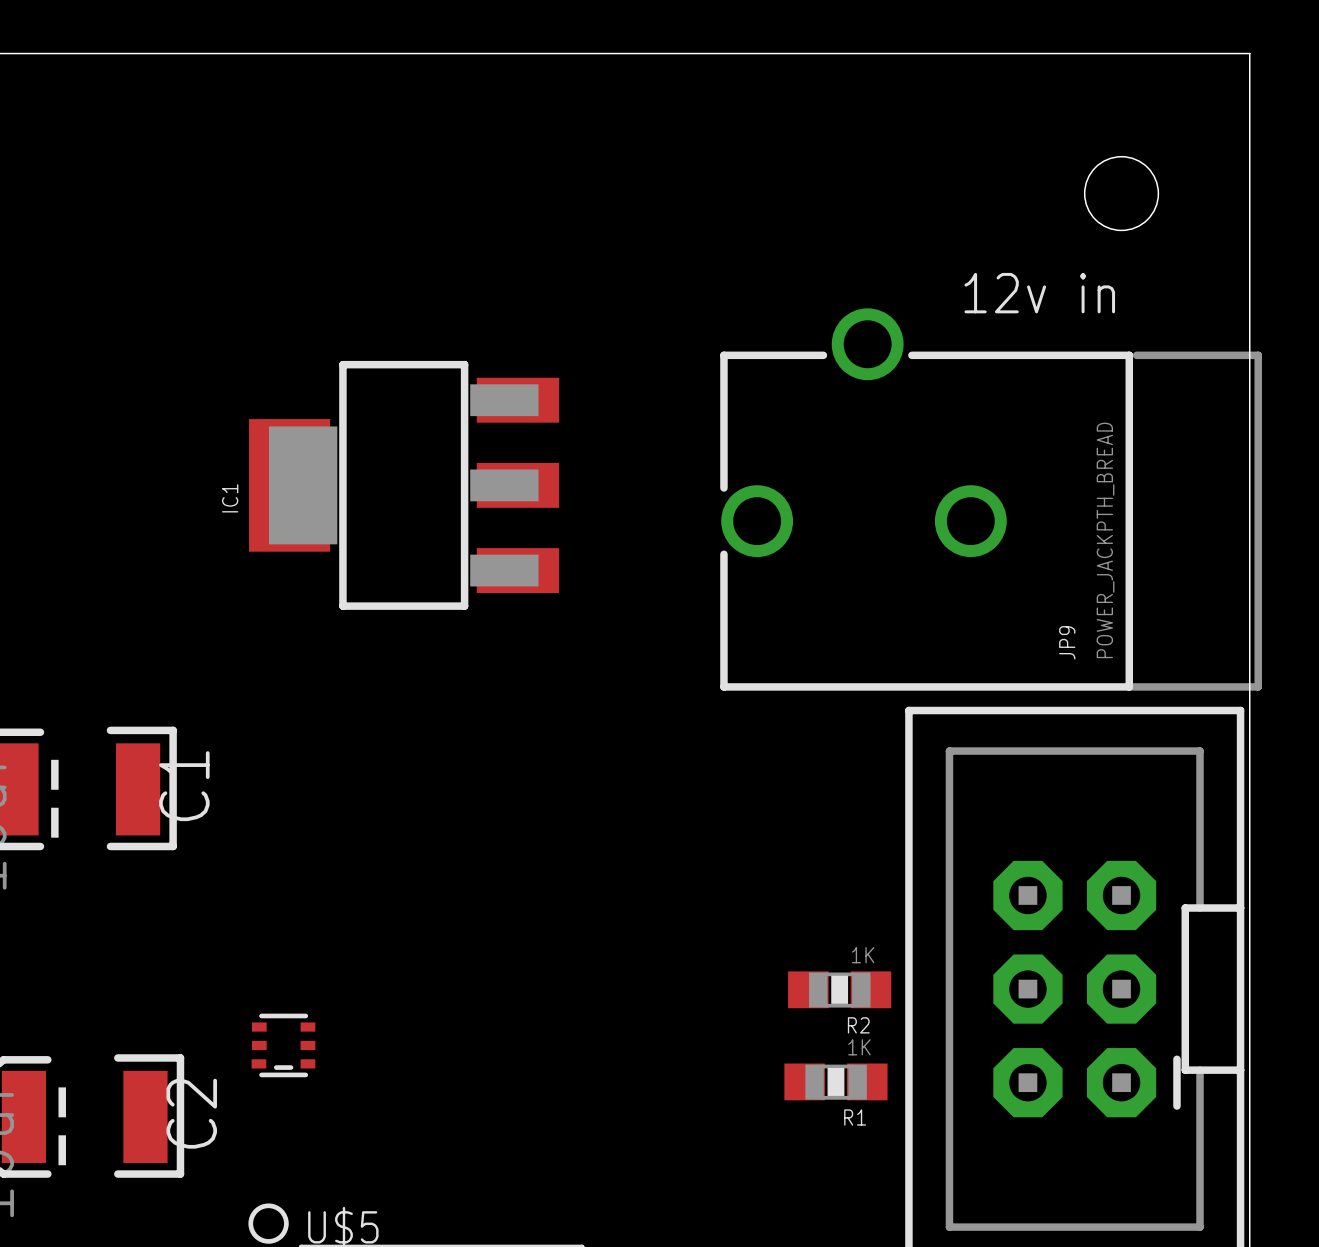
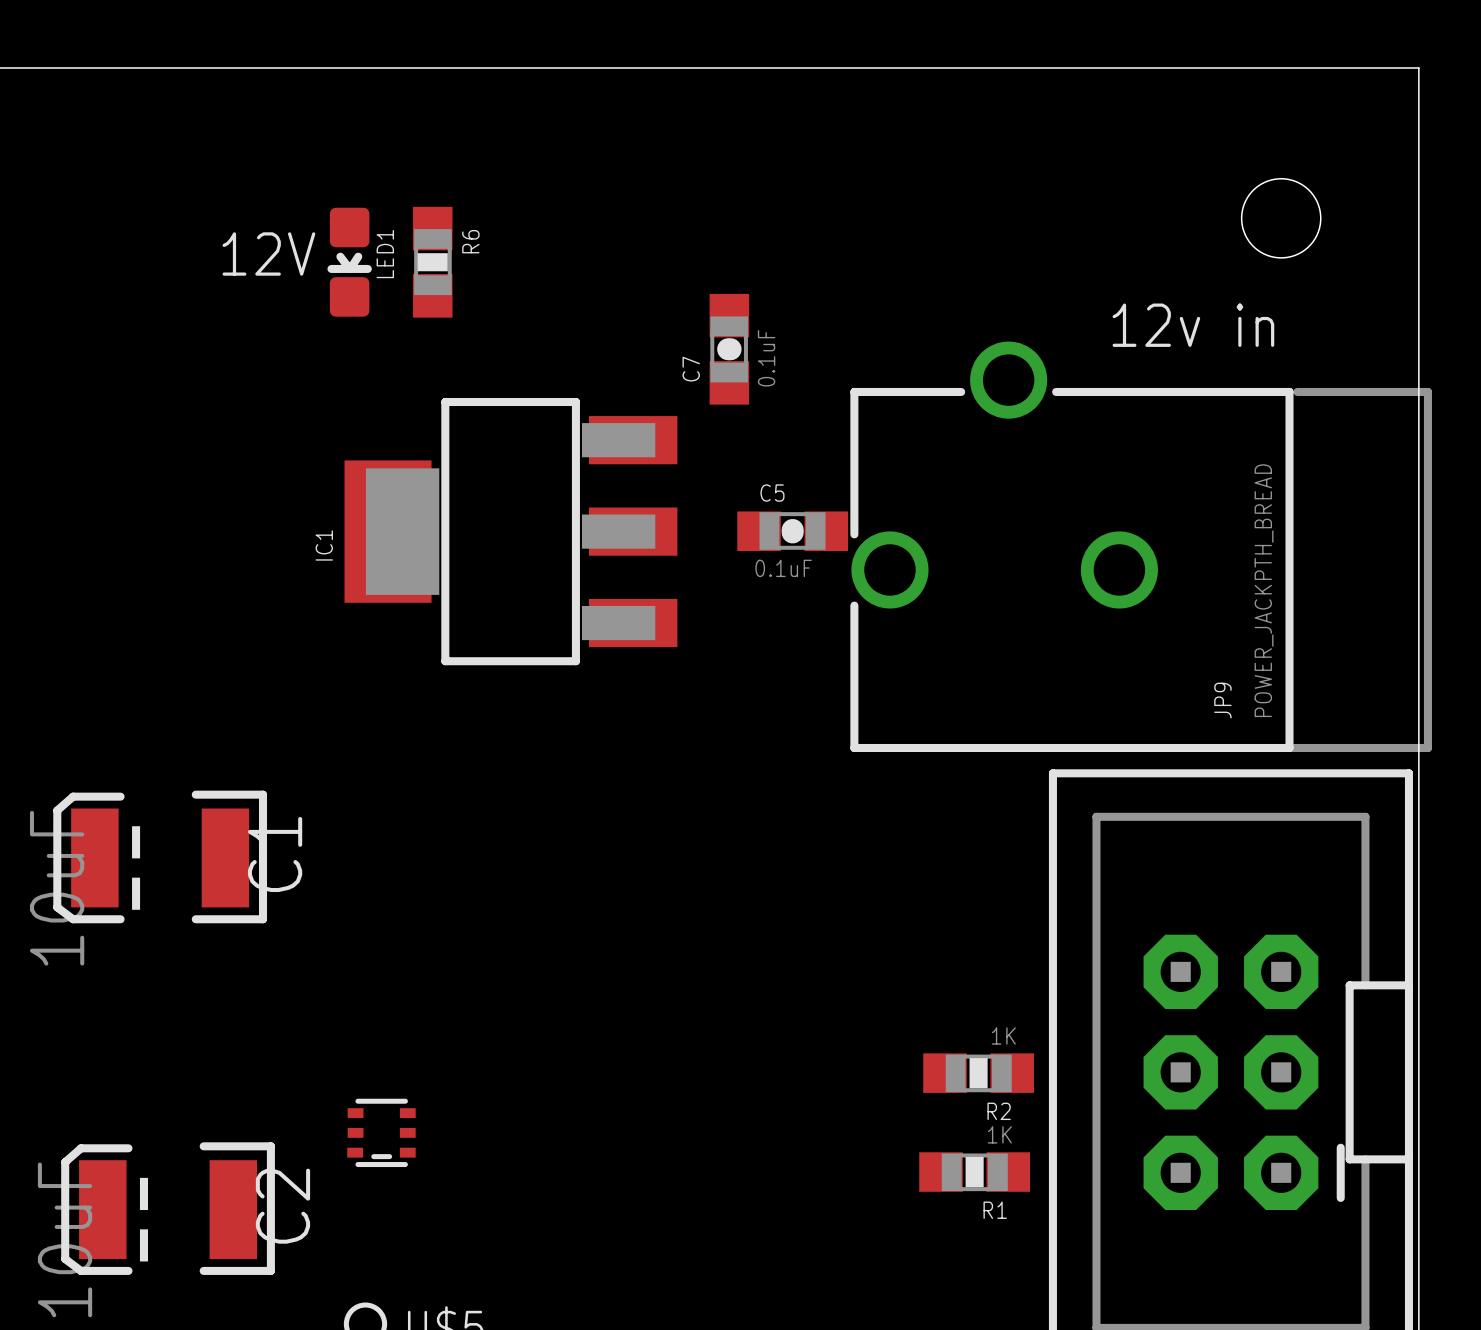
text: none -> 12V (268, 254)
LED1: none -> (349, 262)
R6: none -> (432, 262)
C7: none -> 0.1uF (729, 349)
C5: none -> 0.1uF (792, 531)

